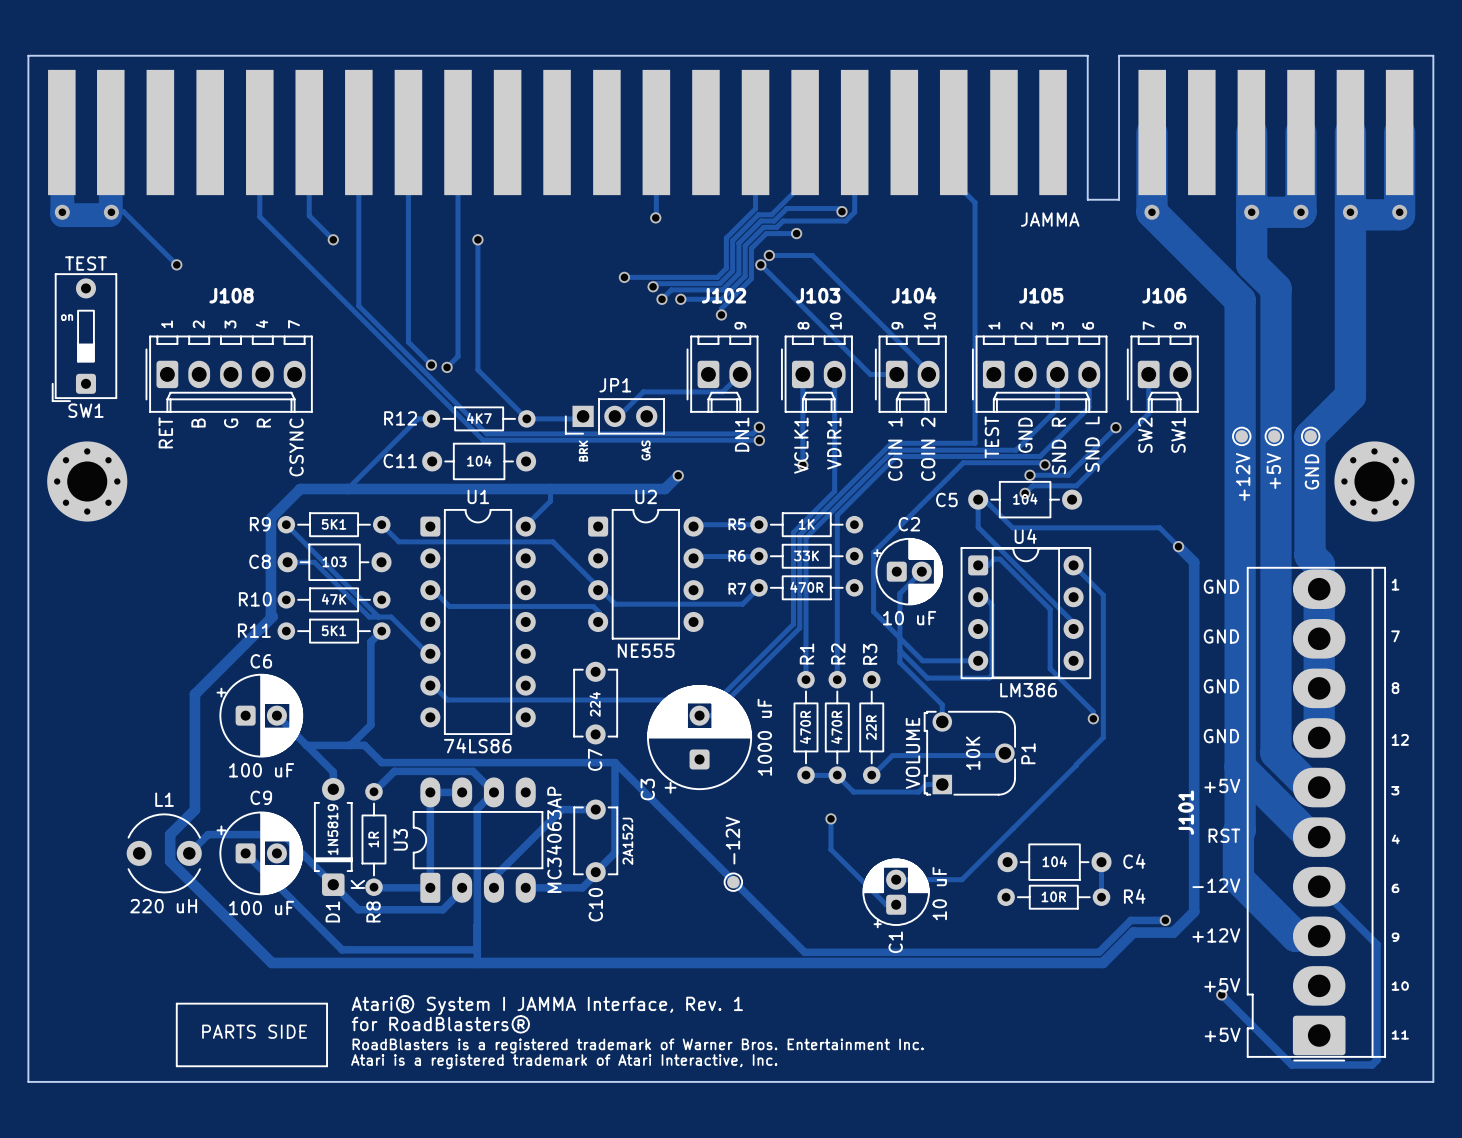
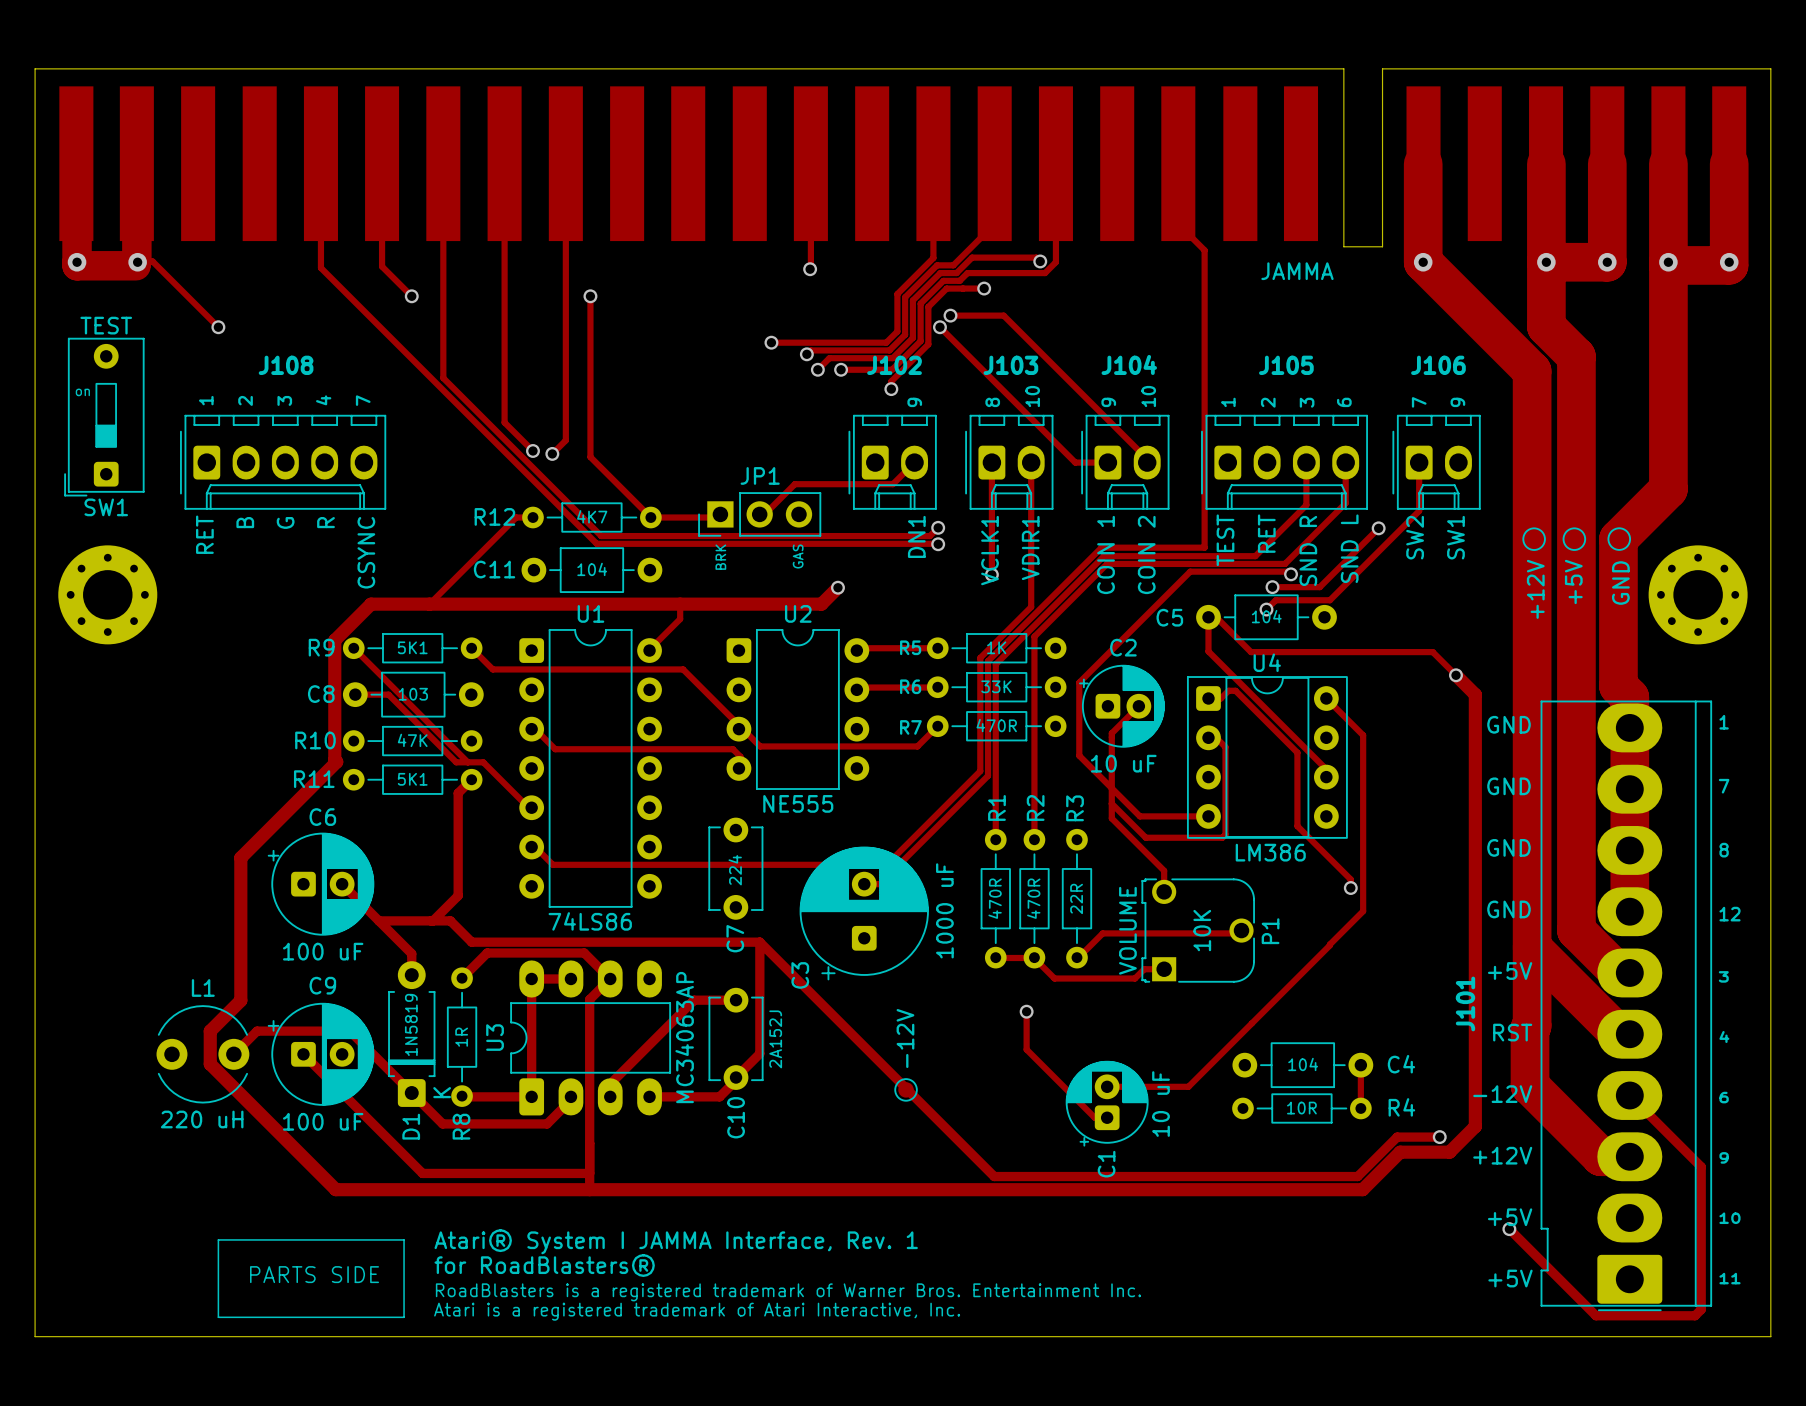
text: GND (1025, 435) -> RET (1266, 533)

